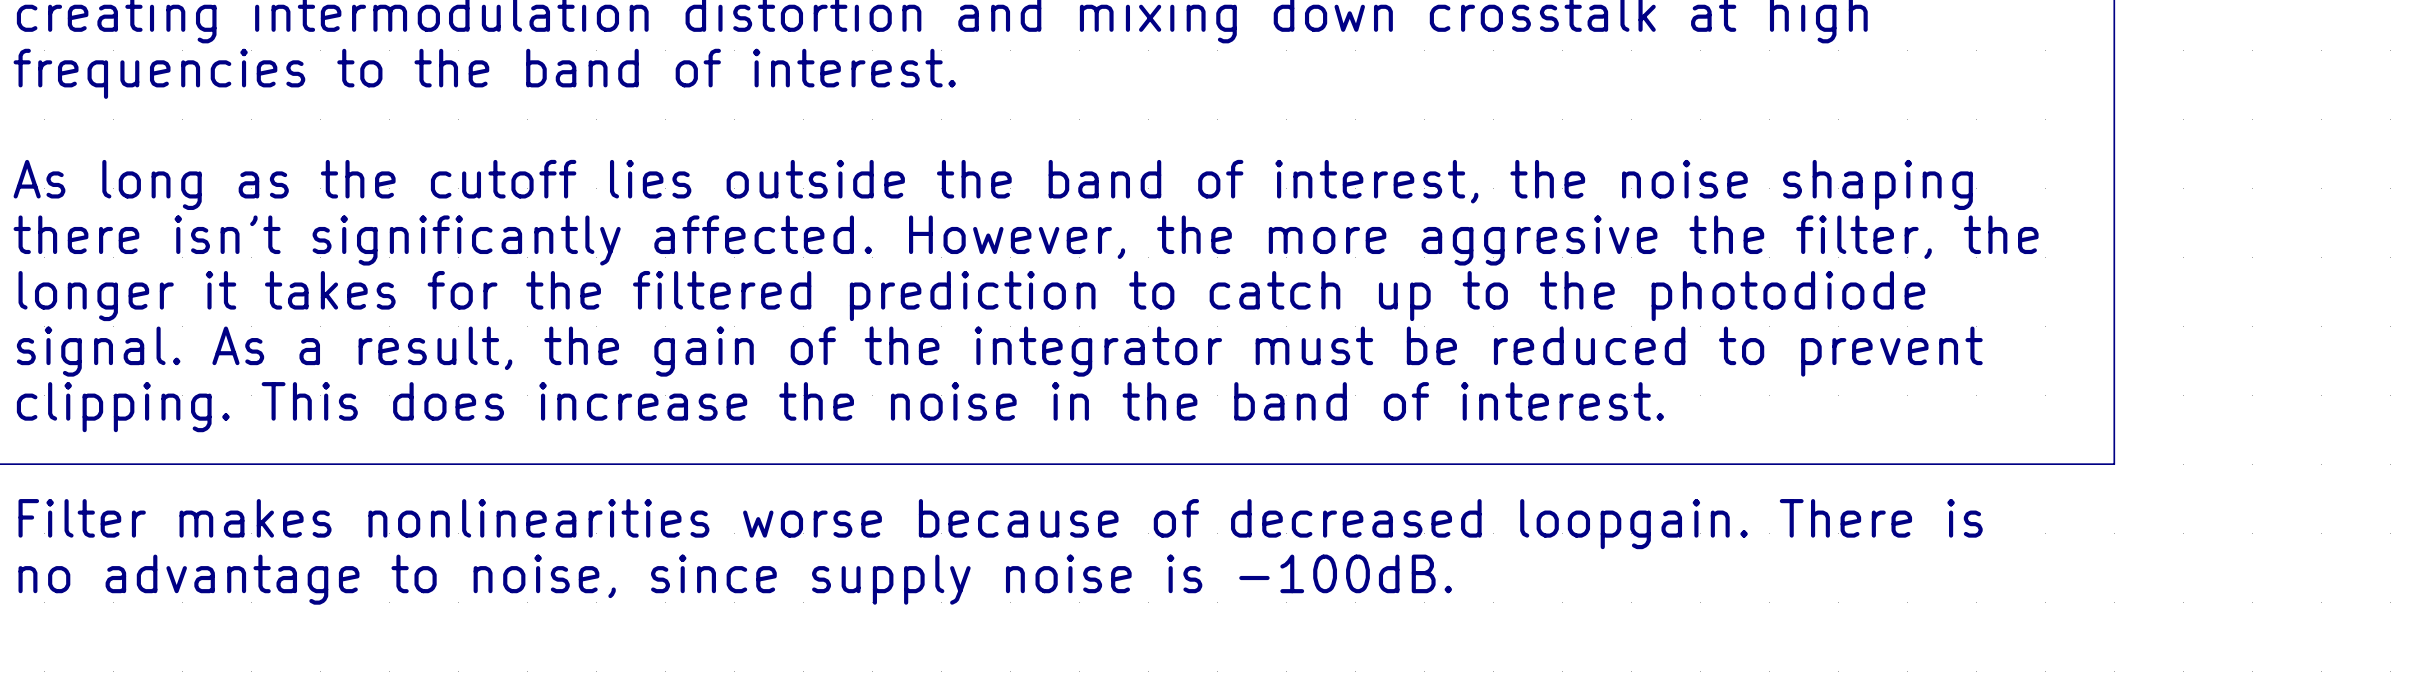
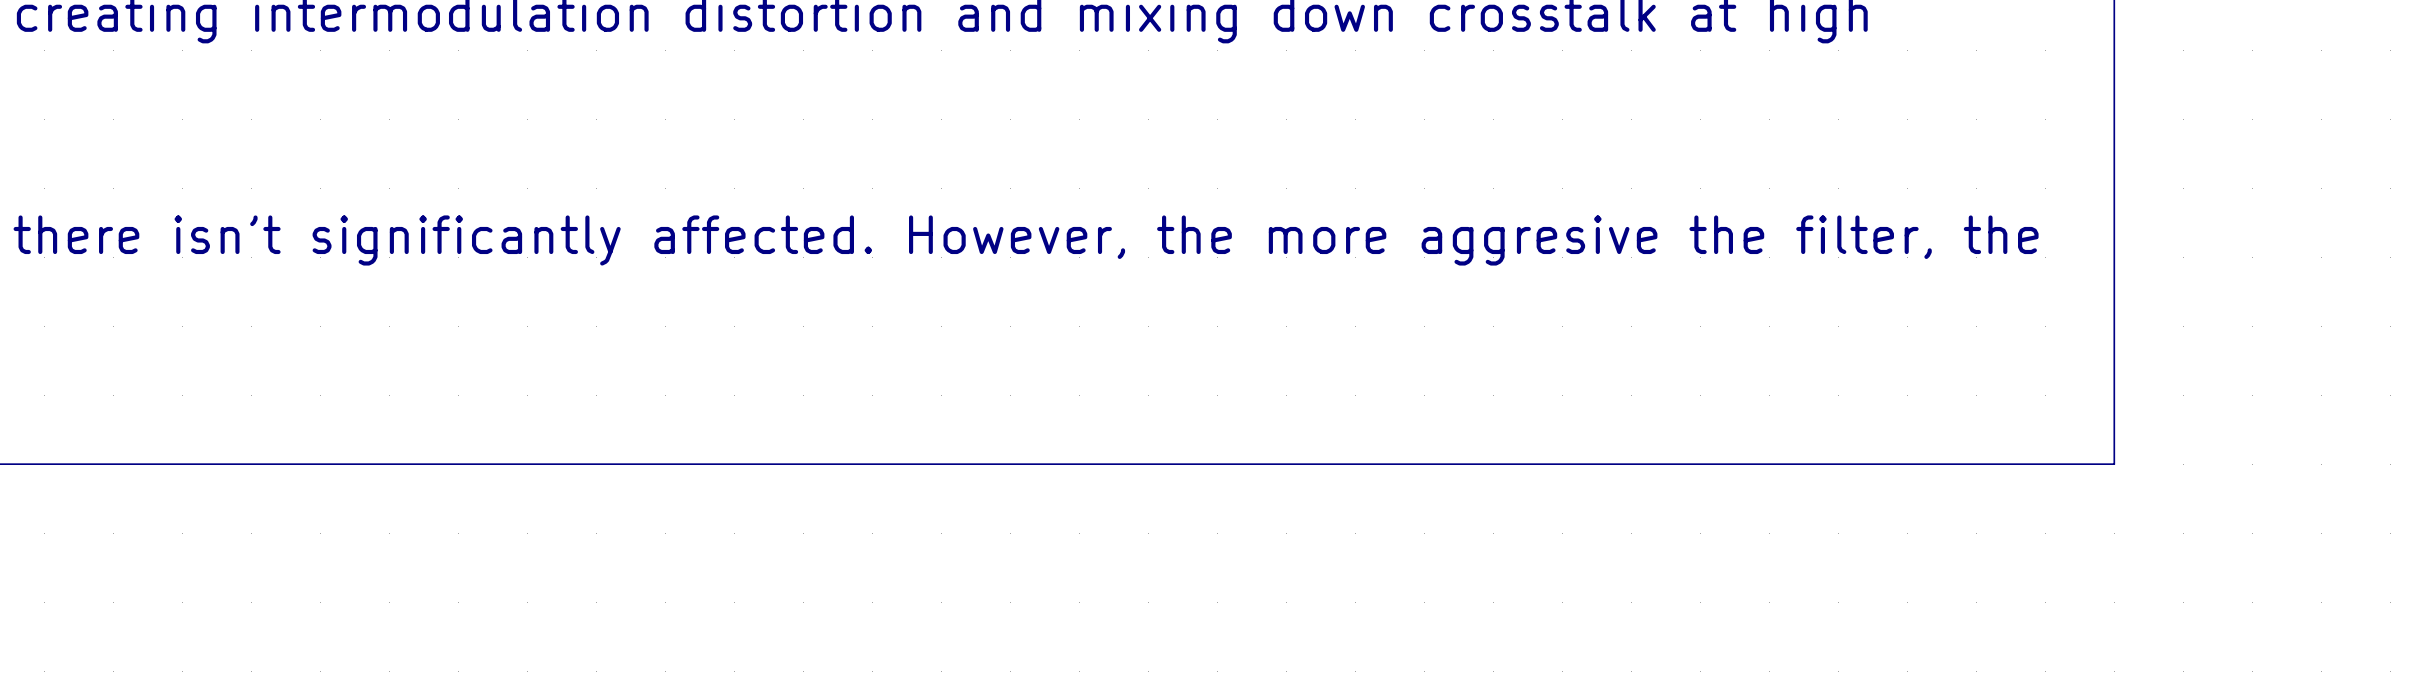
text: frequencies to the band of interest. (484, 73) -> none
text: As long as the cutoff lies outside the band of interest, the noise shaping (993, 184) -> none
text: longer it takes for the filtered prediction to catch up to the photodiode (971, 296) -> none
text: signal. As a result, the gain of the integrator must be reduced to prevent (999, 351) -> none
text: clipping. This does increase the noise in the band of interest. (840, 407) -> none
text: Filter makes nonlinearities worse because of decreased loopgain. There is (1000, 524) -> none
text: no advantage to noise, since supply noise is -100dB. (735, 579) -> none

